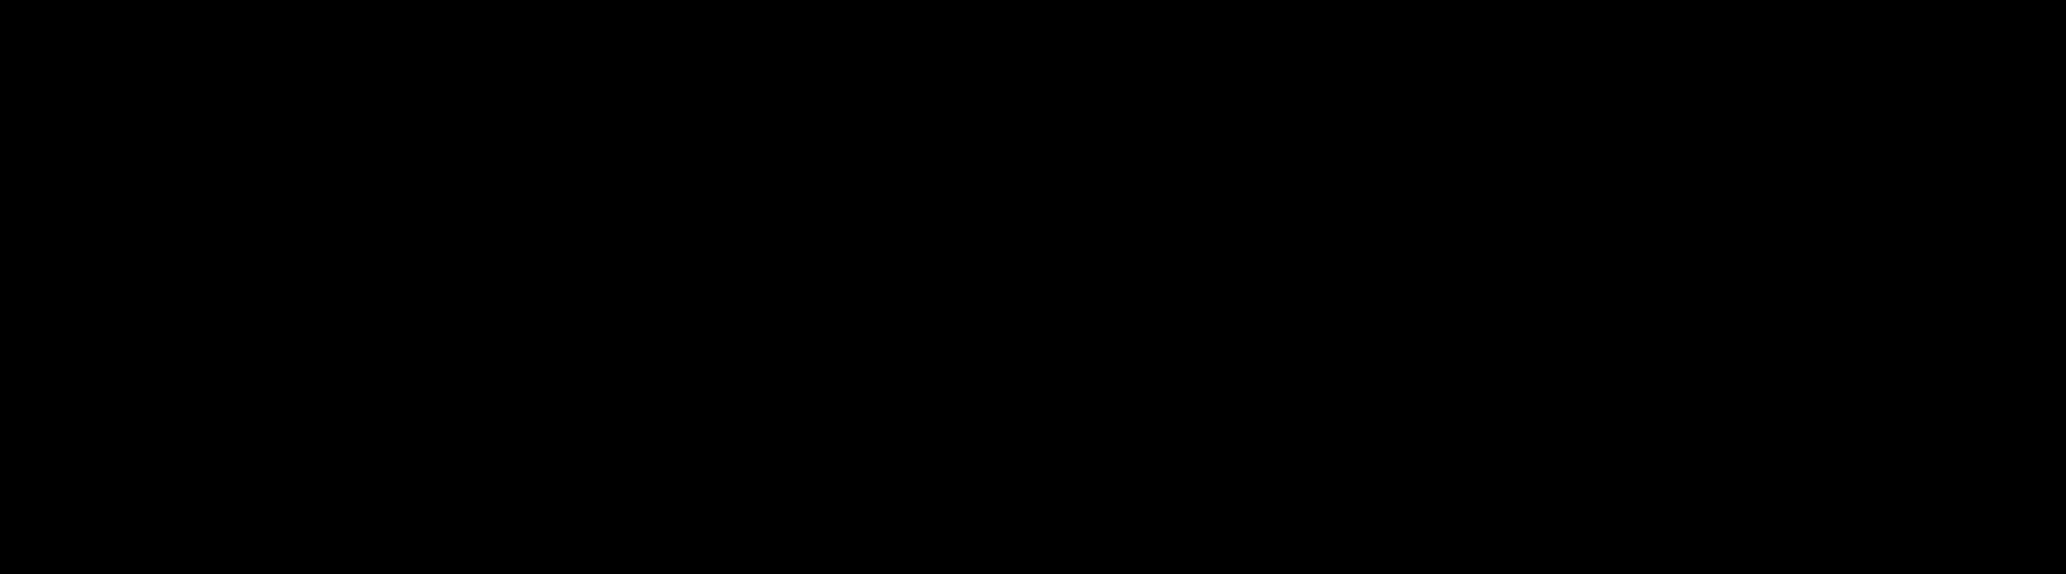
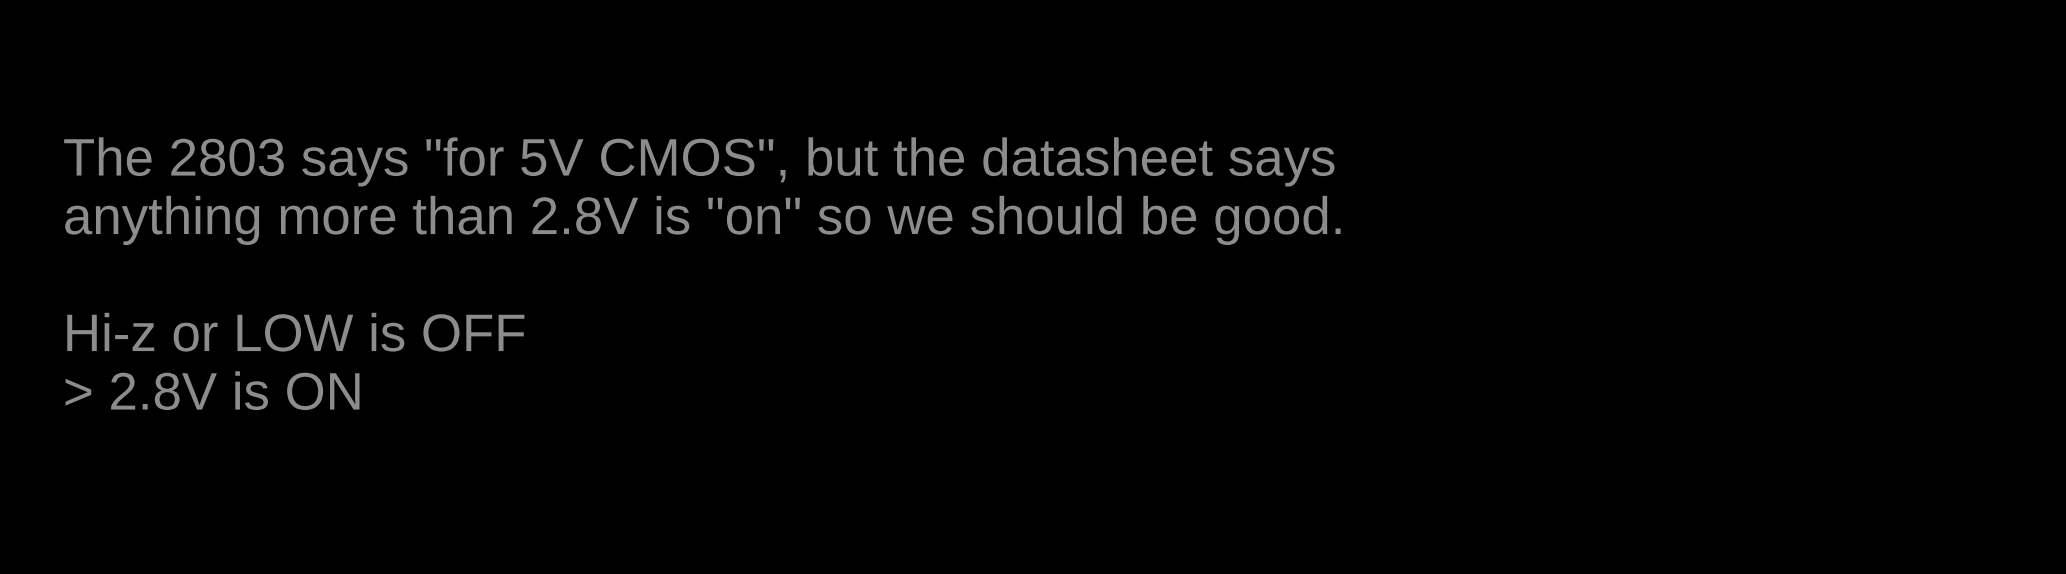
text: none -> The 2803 says "for 5V CMOS", but the datasheet says (699, 161)
text: none -> anything more than 2.8V is "on" so we should be good. (702, 220)
text: none -> Hi-z or LOW is OFF (295, 332)
text: none -> > 2.8V is ON (212, 390)

